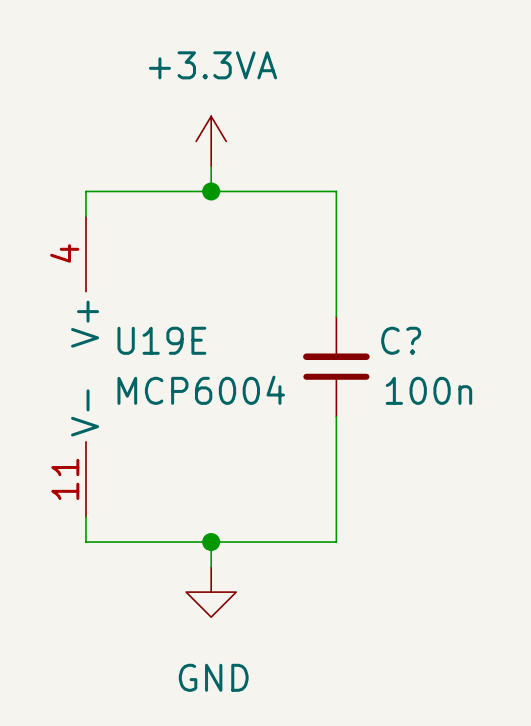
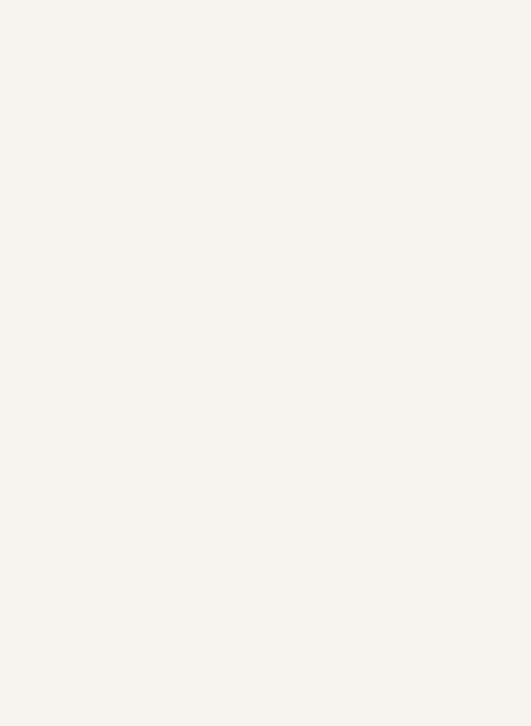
power symbol: +3.3VA (211, 141) -> none
wire: (211, 166) (211, 191) -> none
junction: (211, 191) -> none
wire: (85, 216) (85, 191) (336, 191) (336, 316) -> none
U19E: MCP6004 (85, 366) -> none
C?: 100n (336, 366) -> none
wire: (336, 416) (336, 542) (85, 542) (85, 516) -> none
wire: (211, 542) (211, 567) -> none
junction: (211, 542) -> none
power symbol: GND (211, 592) -> none

